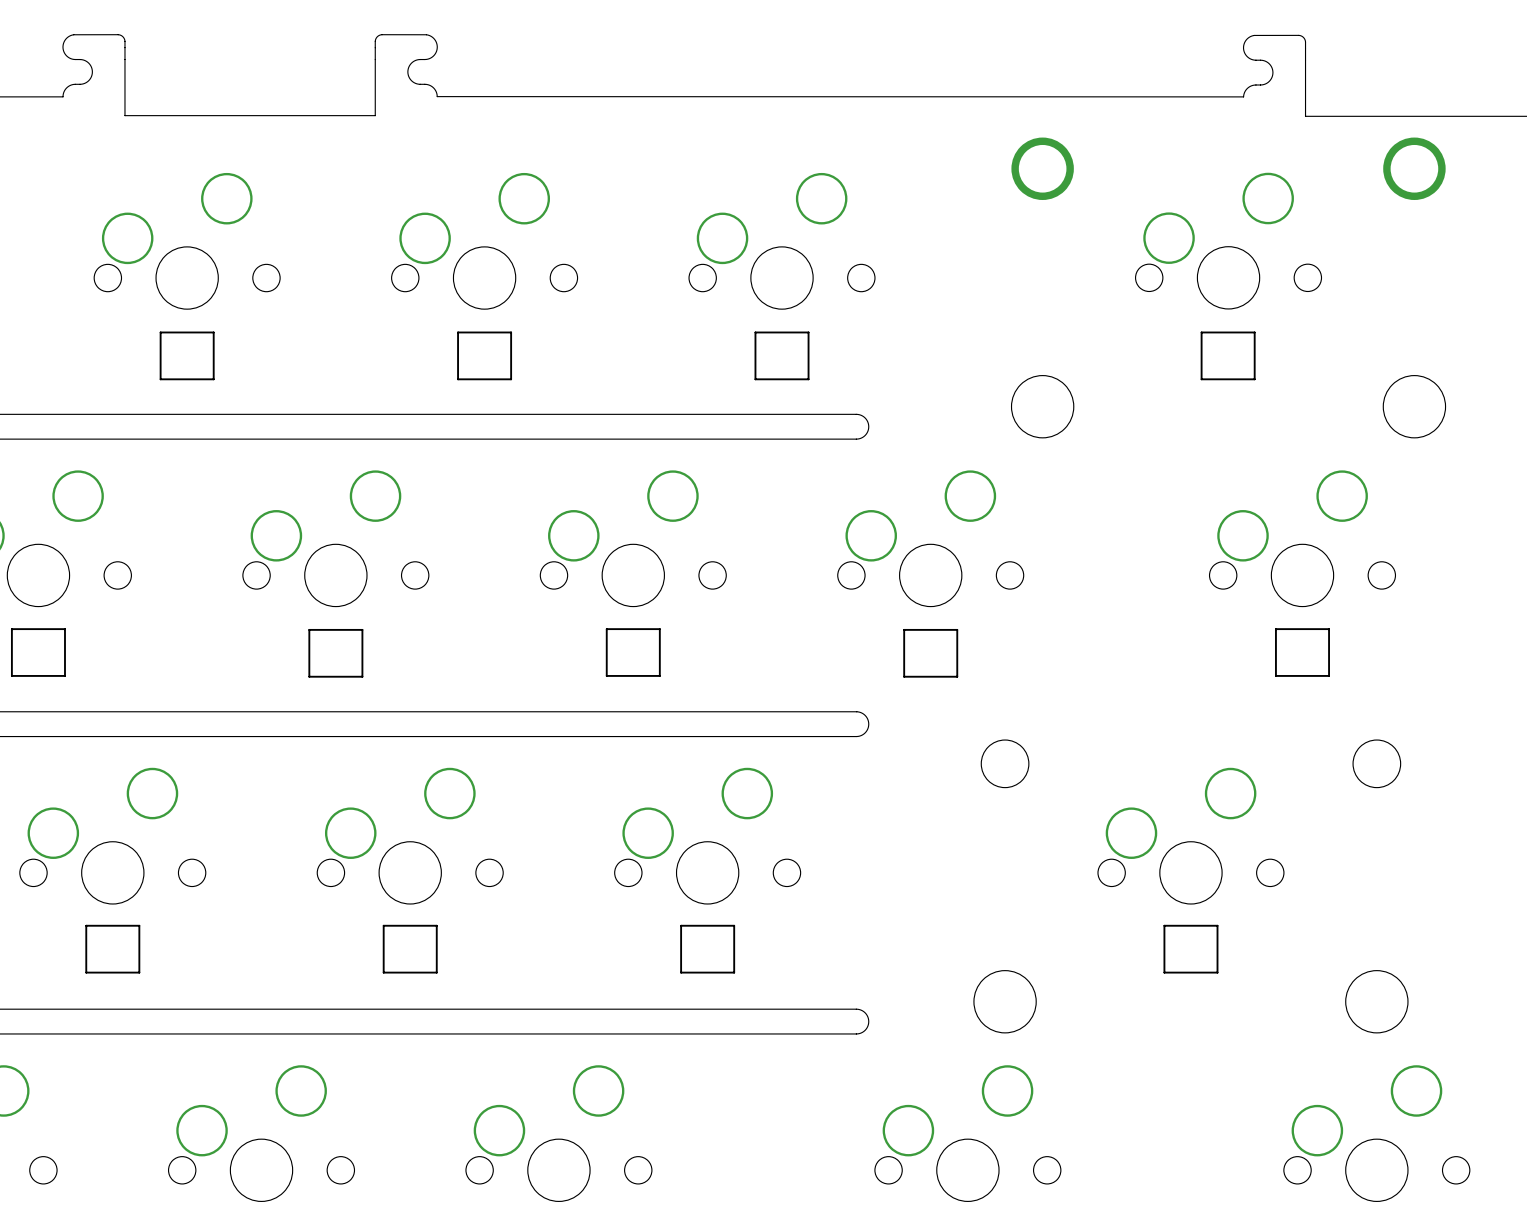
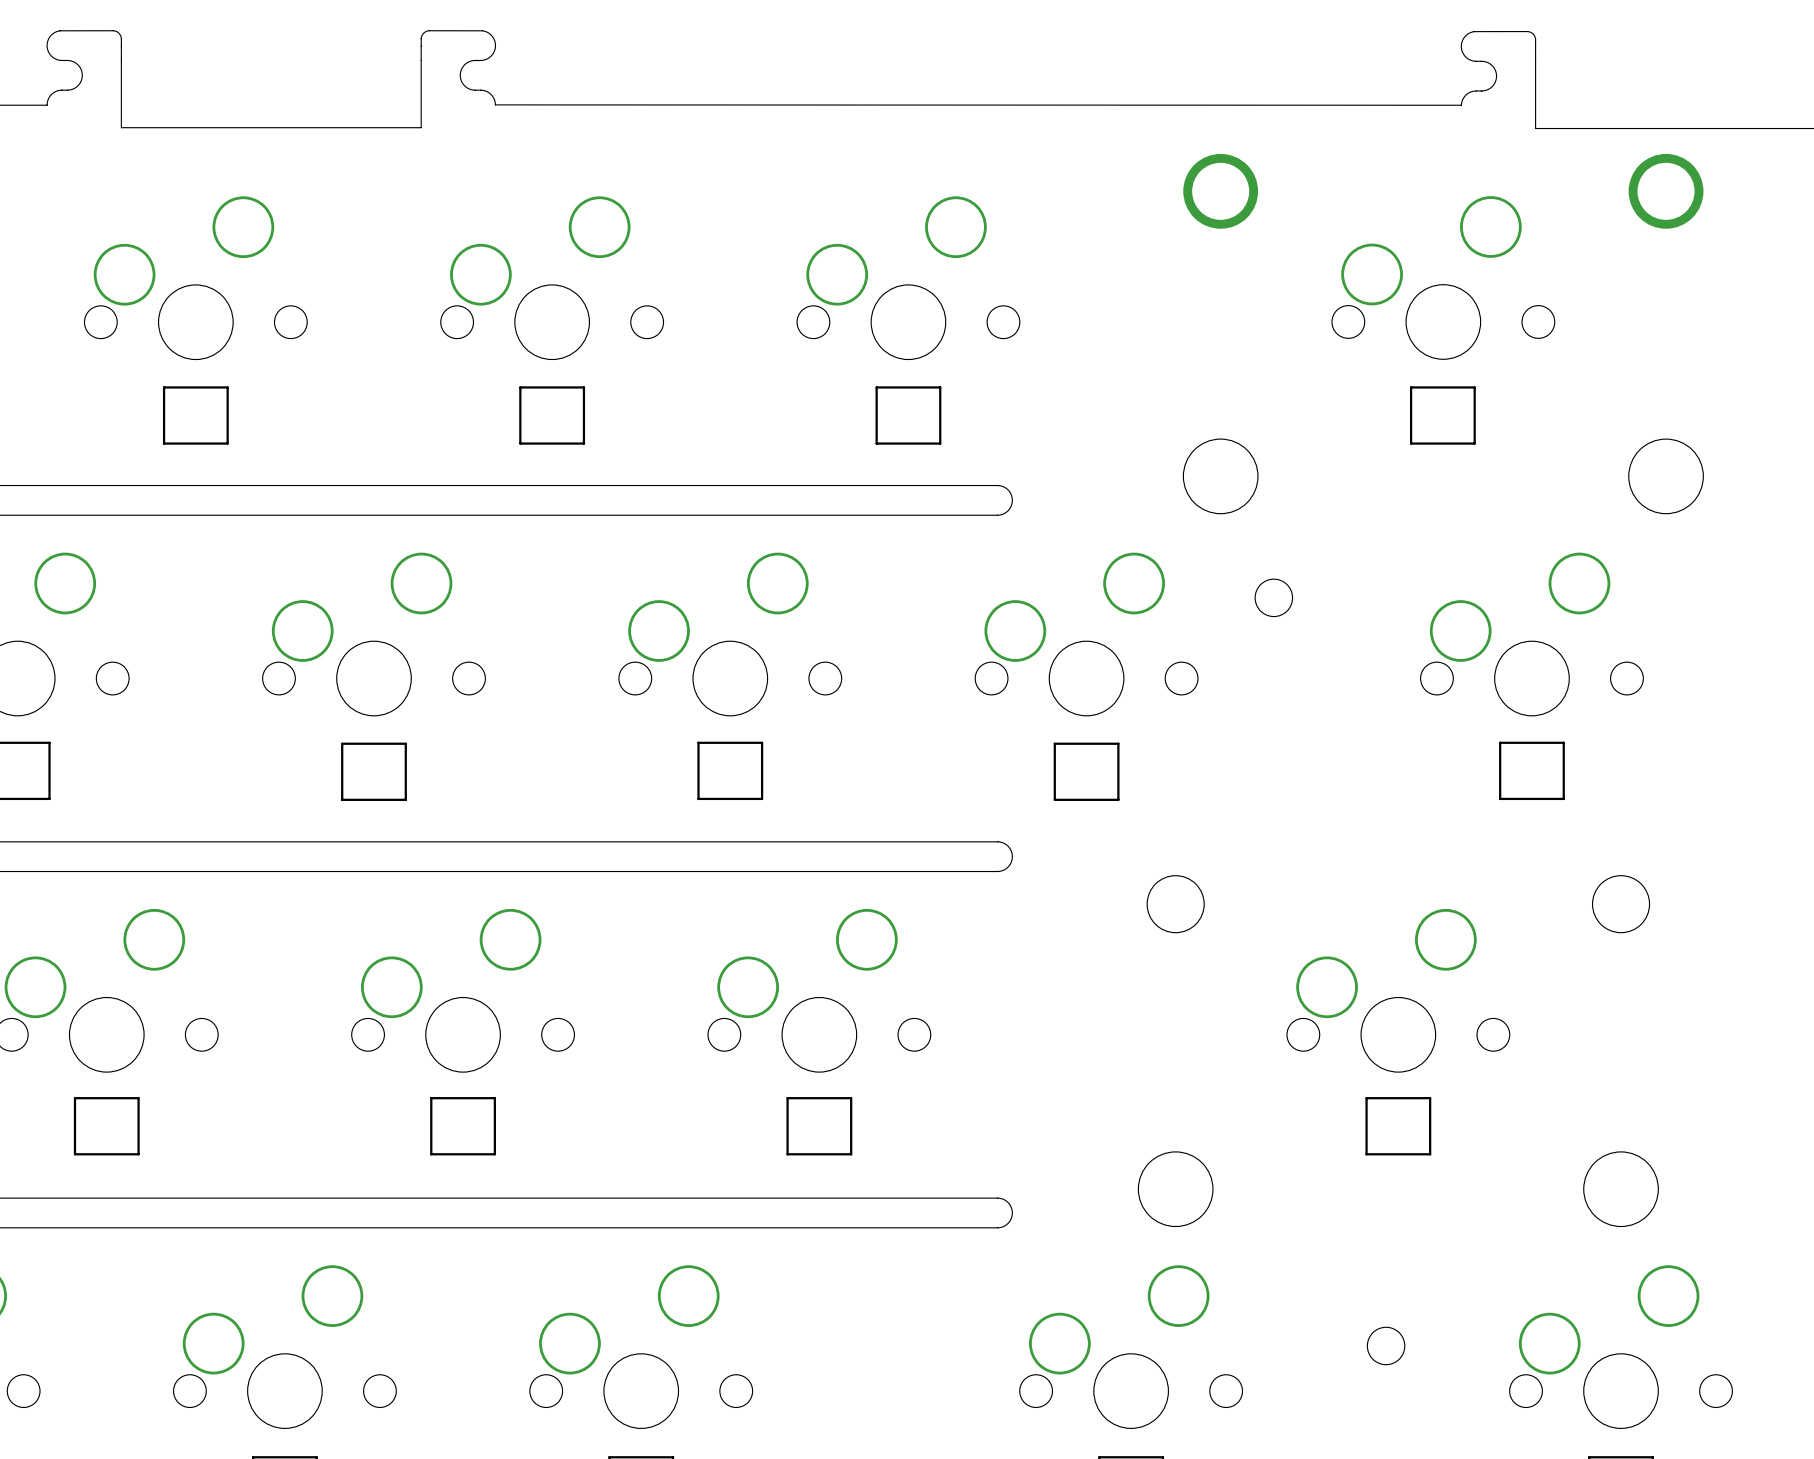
round board edge: none -> [1254, 578, 1294, 618]
round board edge: none -> [1366, 1326, 1406, 1366]

